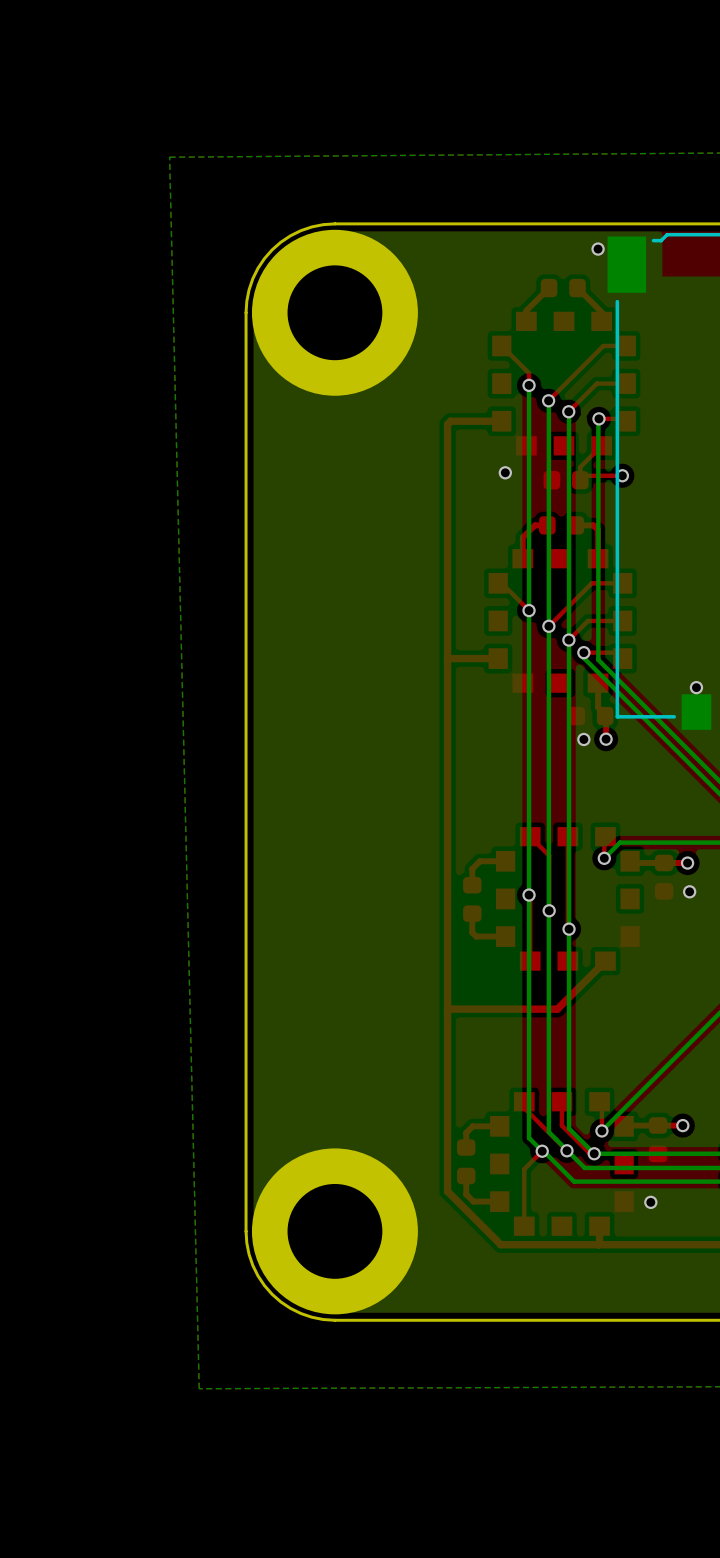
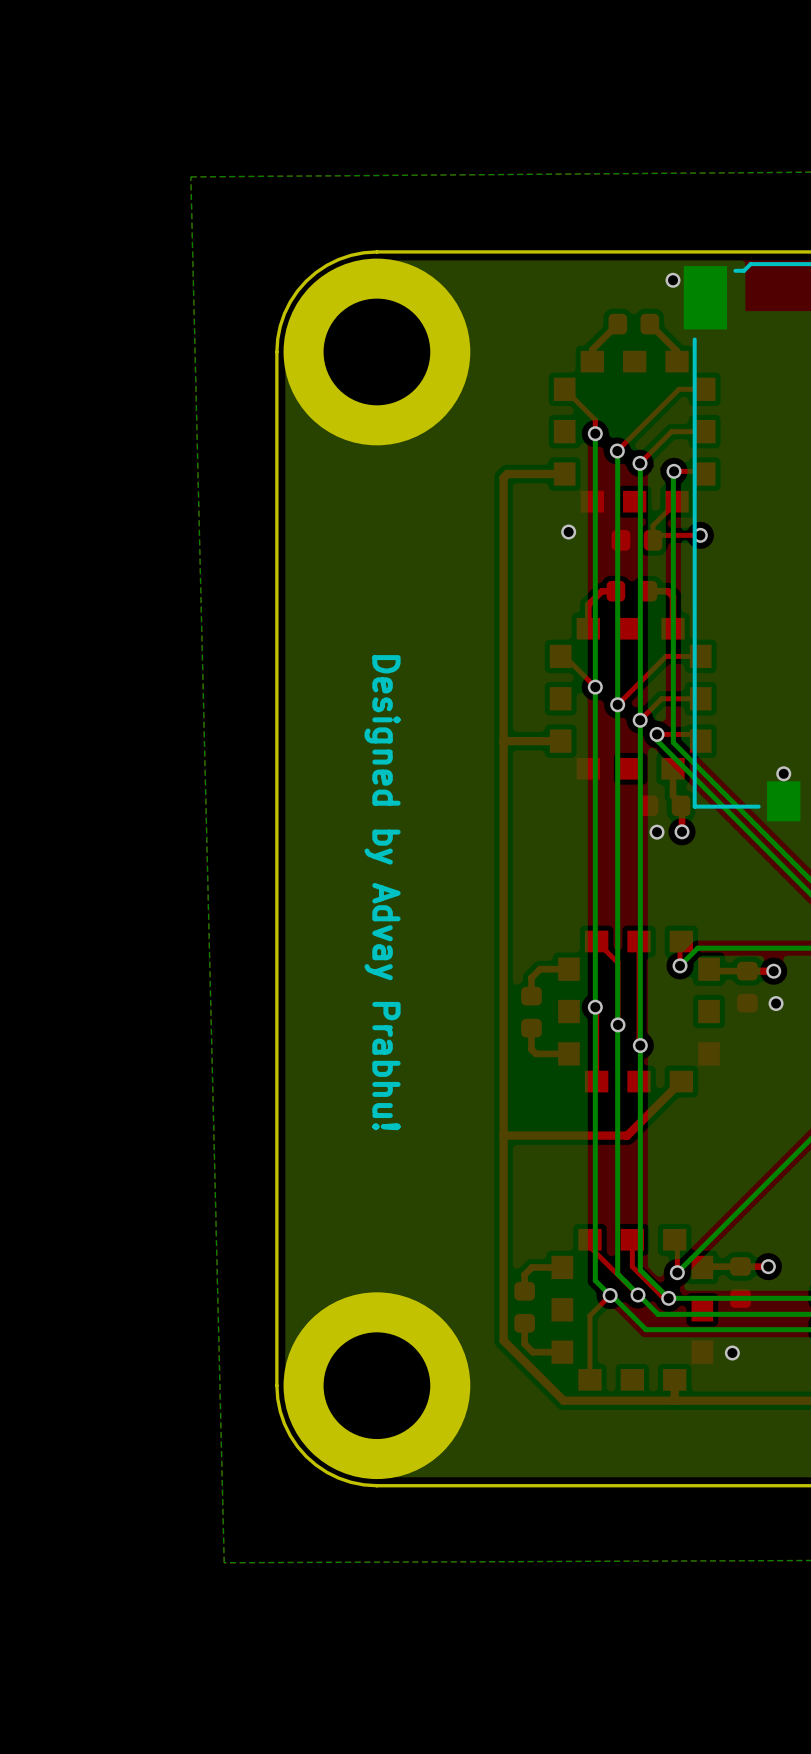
text: none -> Designed by Advay Prabhu! (382, 892)

